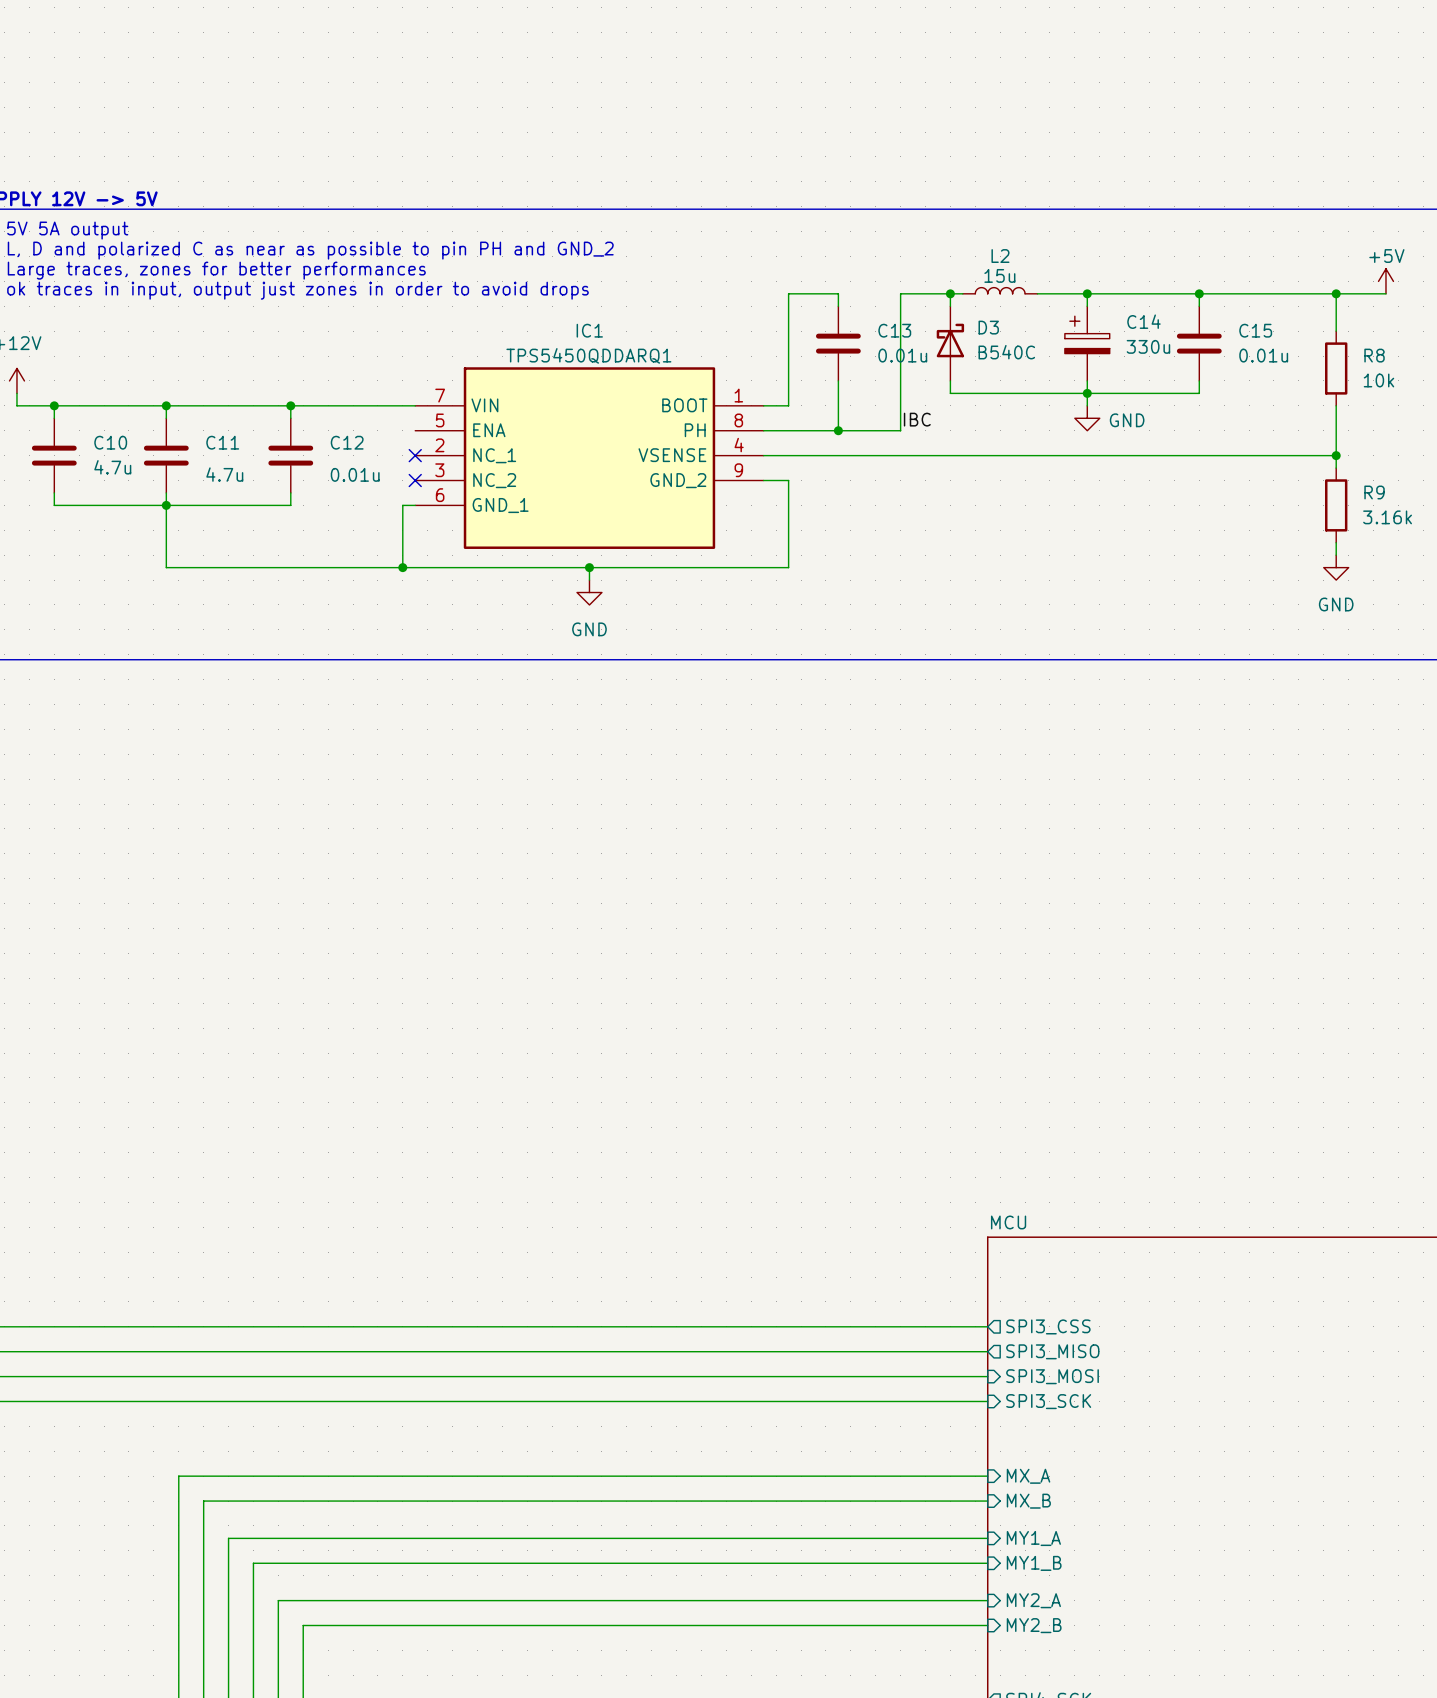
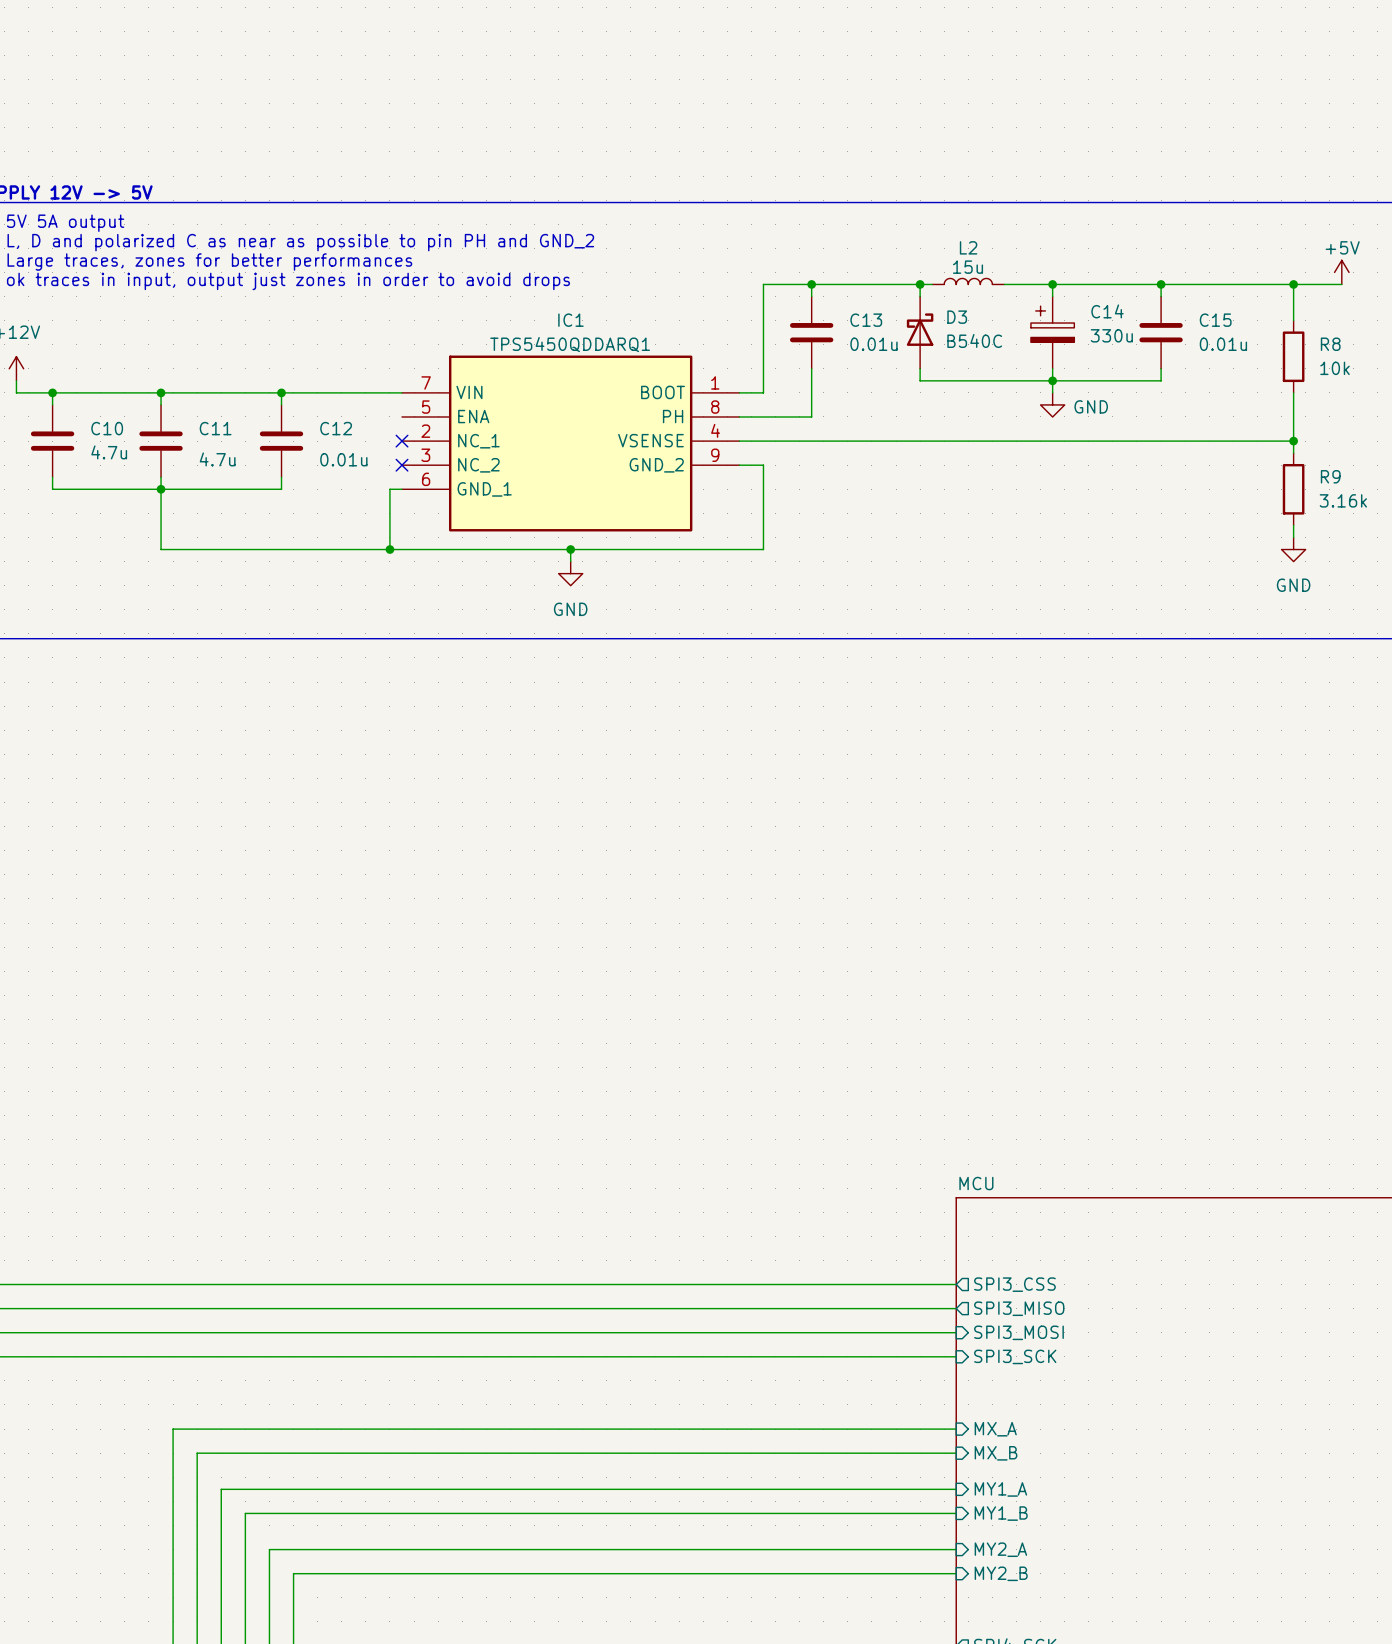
junction: none -> (811, 284)
wire: (900, 293) (900, 430) (838, 430) -> (871, 284) (811, 284)
label: IBC (917, 419) -> none
junction: (838, 430) -> none

